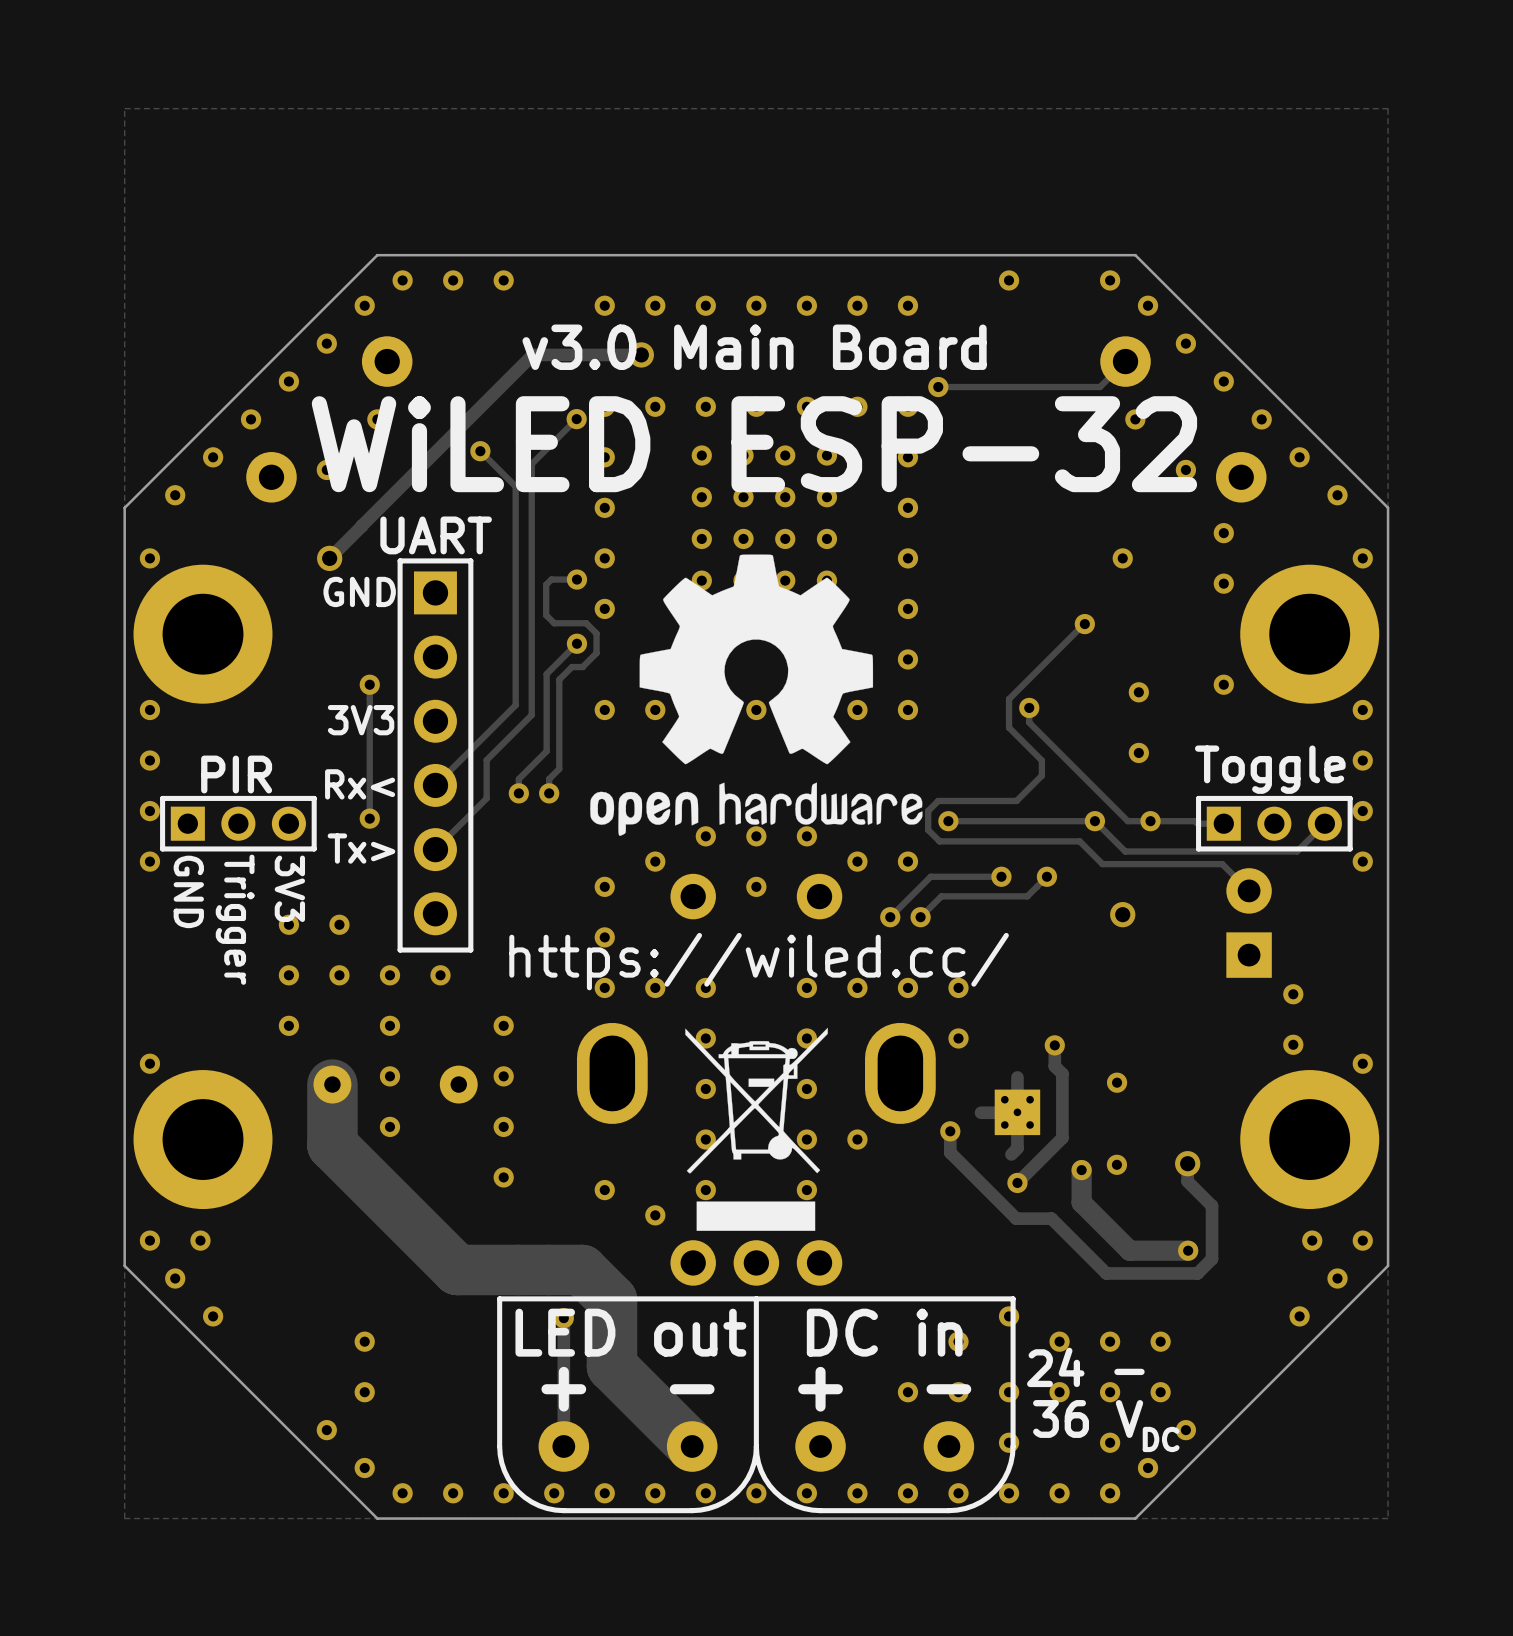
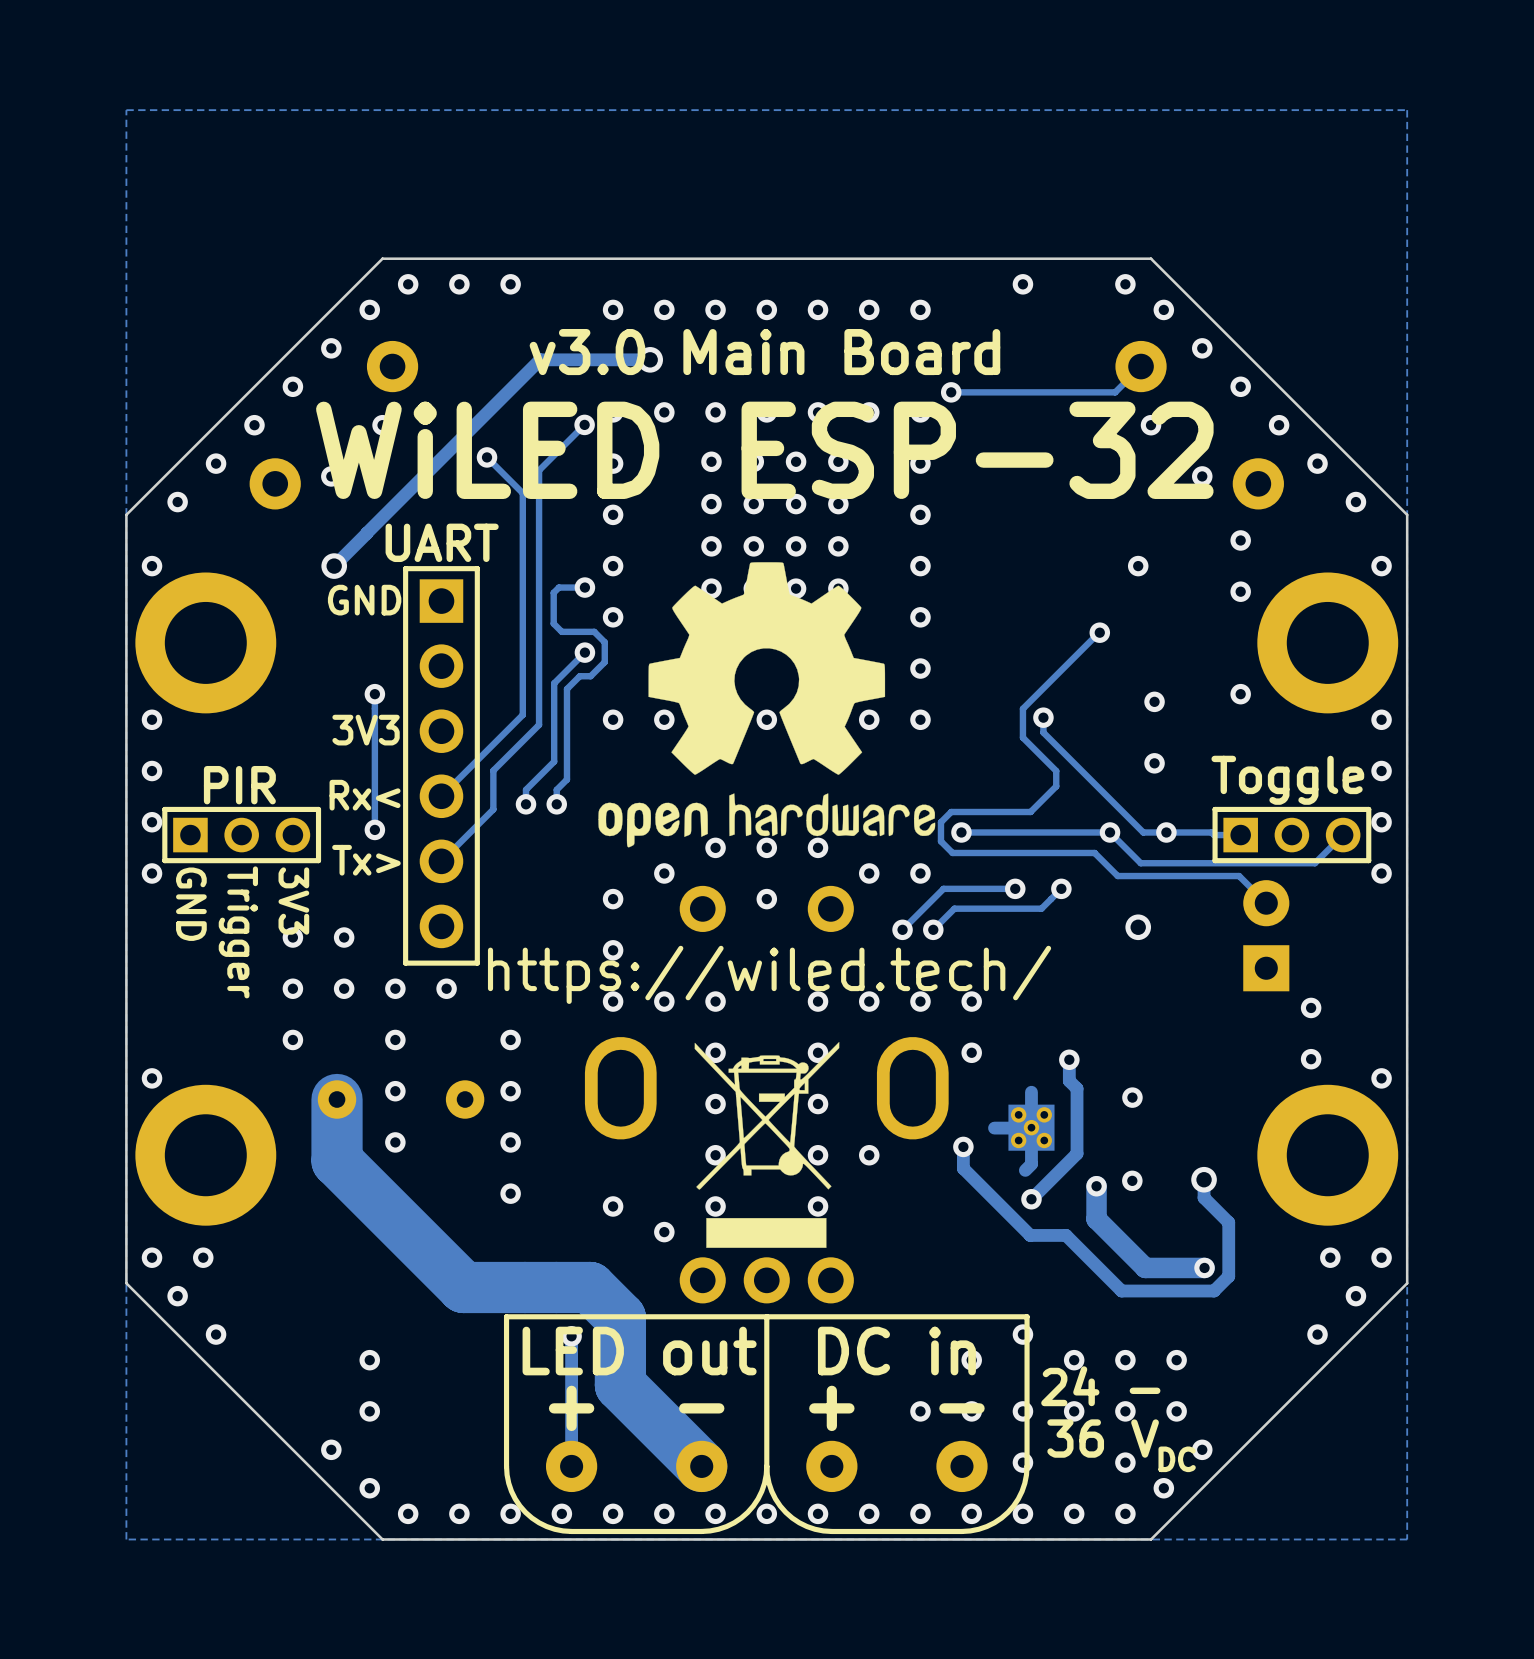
text: https://wiled.cc/ (759, 961) -> https://wiled.tech/ (769, 974)

